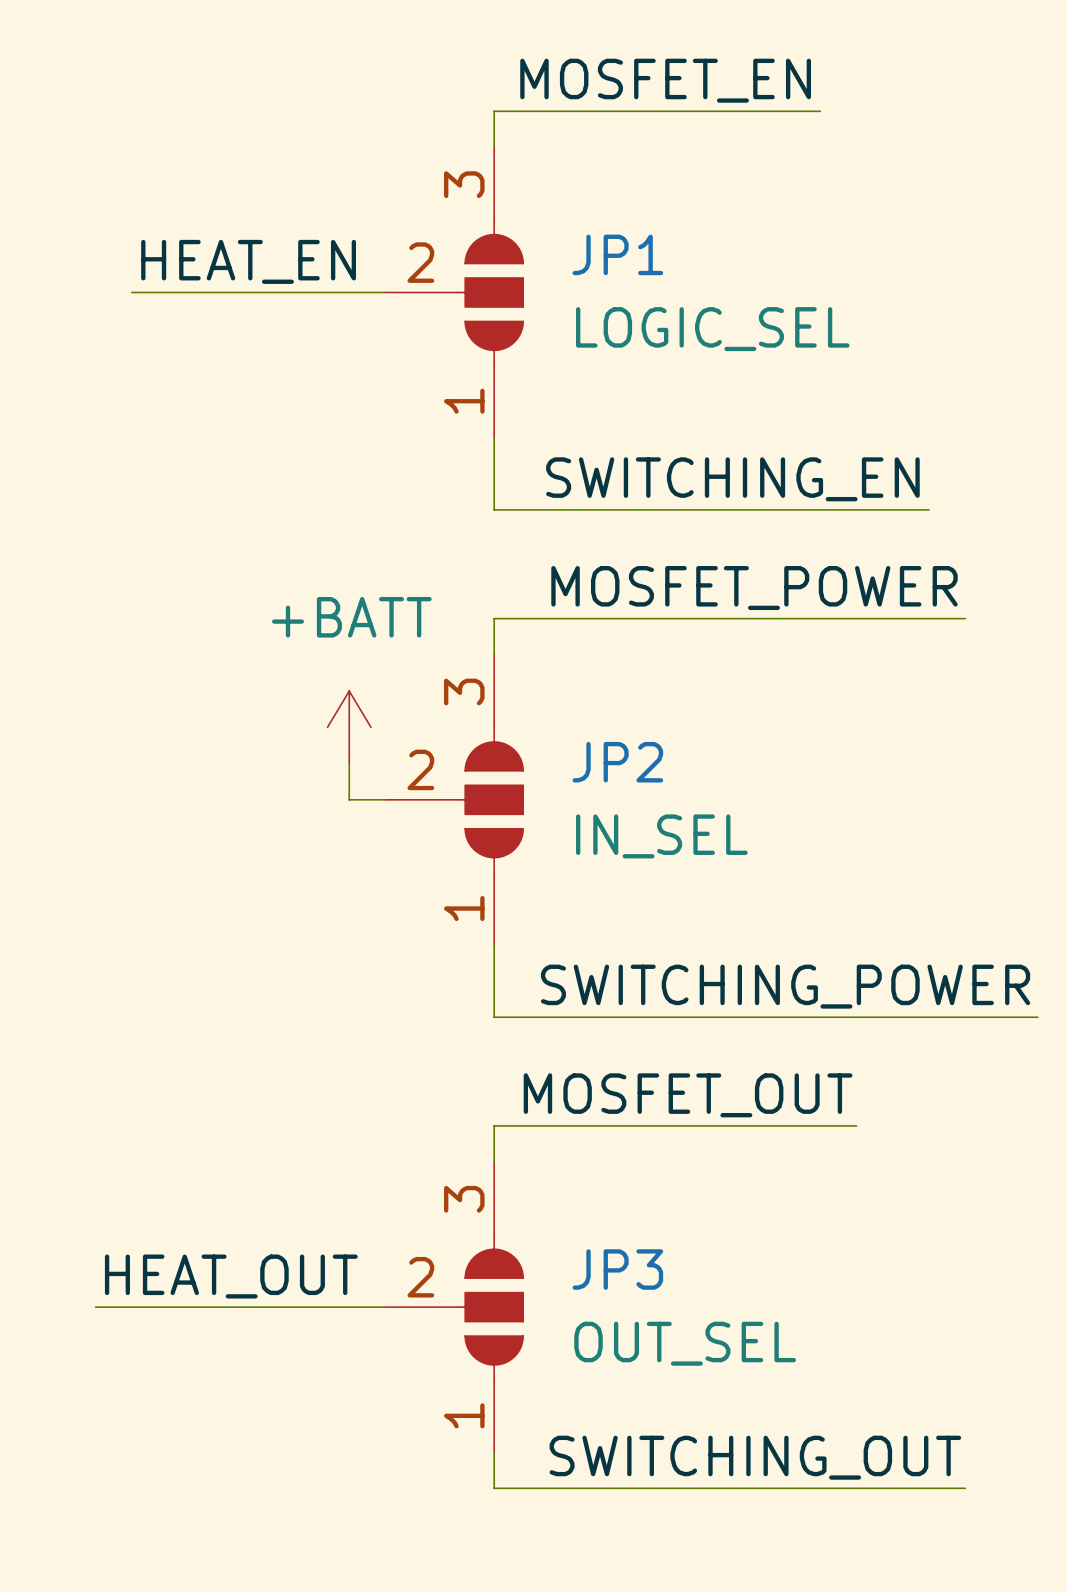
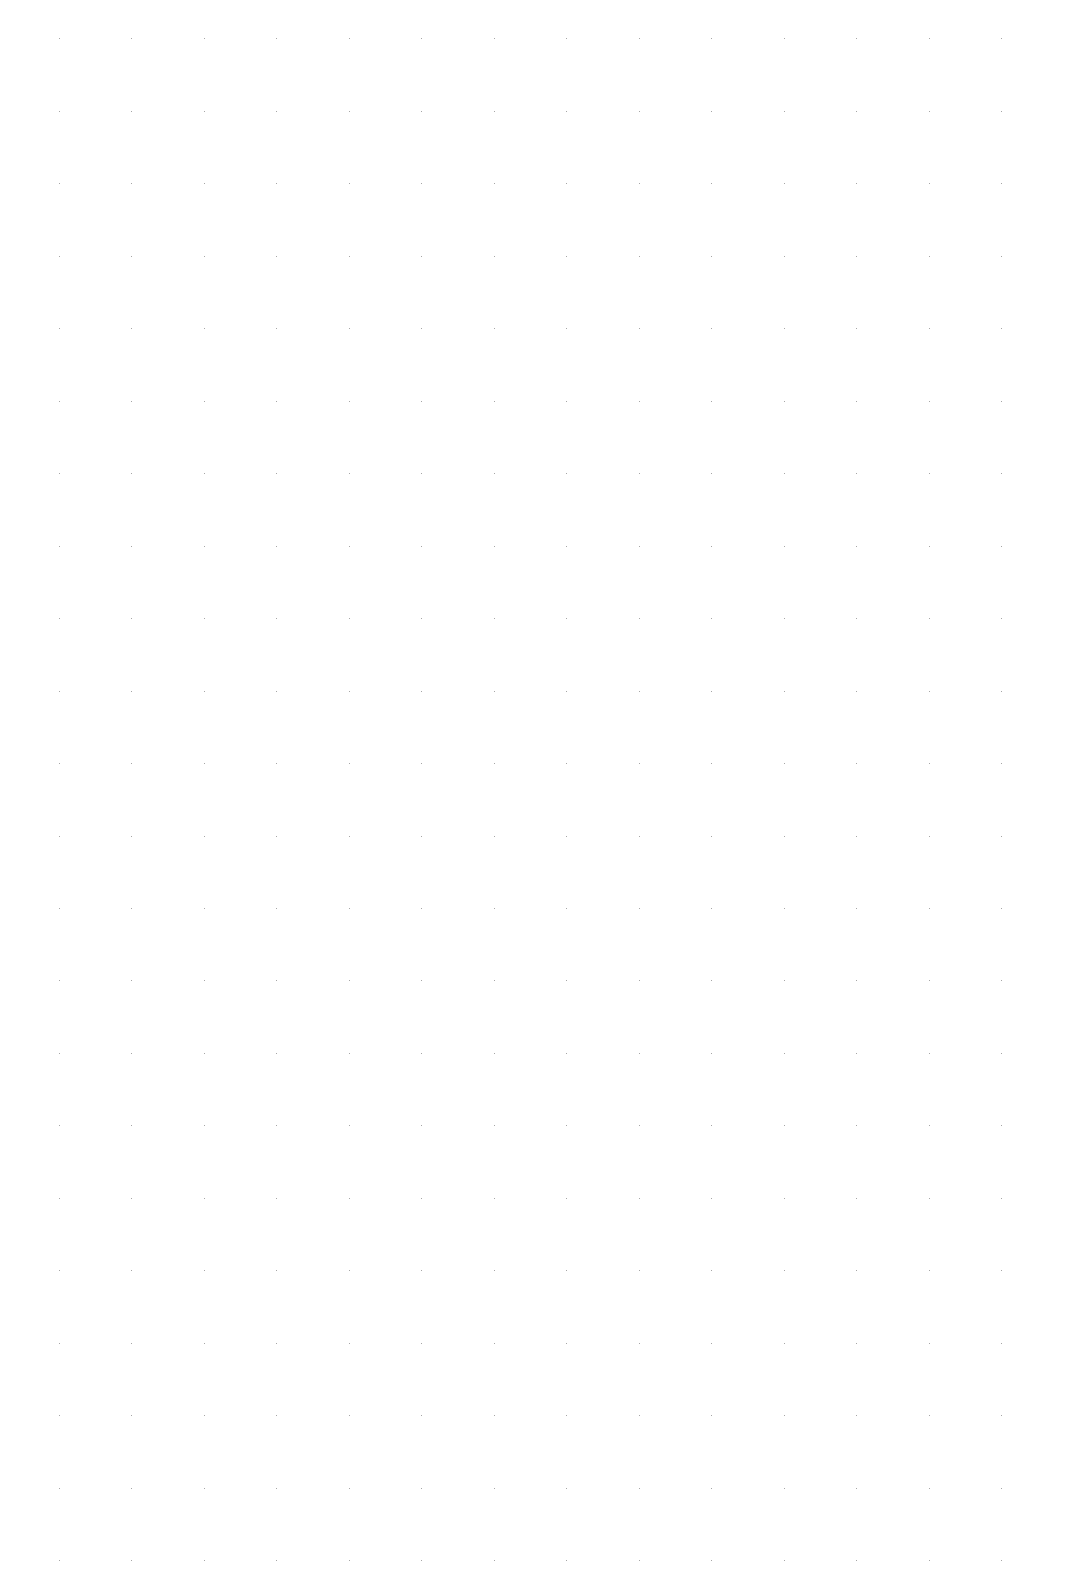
label: MOSFET_EN (665, 80) -> none
wire: (820, 111) (494, 111) (494, 147) -> none
label: HEAT_EN (248, 261) -> none
wire: (131, 292) (385, 292) -> none
JP1: LOGIC_SEL (454, 292) -> none
wire: (494, 437) (494, 509) (929, 509) -> none
label: SWITCHING_EN (732, 479) -> none
label: MOSFET_POWER (754, 588) -> none
wire: (965, 618) (494, 618) (494, 654) -> none
power symbol: +BATT (349, 727) -> none
wire: (349, 763) (349, 799) (385, 799) -> none
JP2: IN_SEL (454, 799) -> none
wire: (494, 944) (494, 1017) (1037, 1017) -> none
label: SWITCHING_POWER (785, 986) -> none
label: MOSFET_OUT (688, 1095) -> none
wire: (856, 1125) (494, 1125) (494, 1162) -> none
label: HEAT_OUT (231, 1276) -> none
wire: (95, 1307) (385, 1307) -> none
JP3: OUT_SEL (454, 1307) -> none
wire: (494, 1452) (494, 1488) (965, 1488) -> none
label: SWITCHING_OUT (755, 1457) -> none

